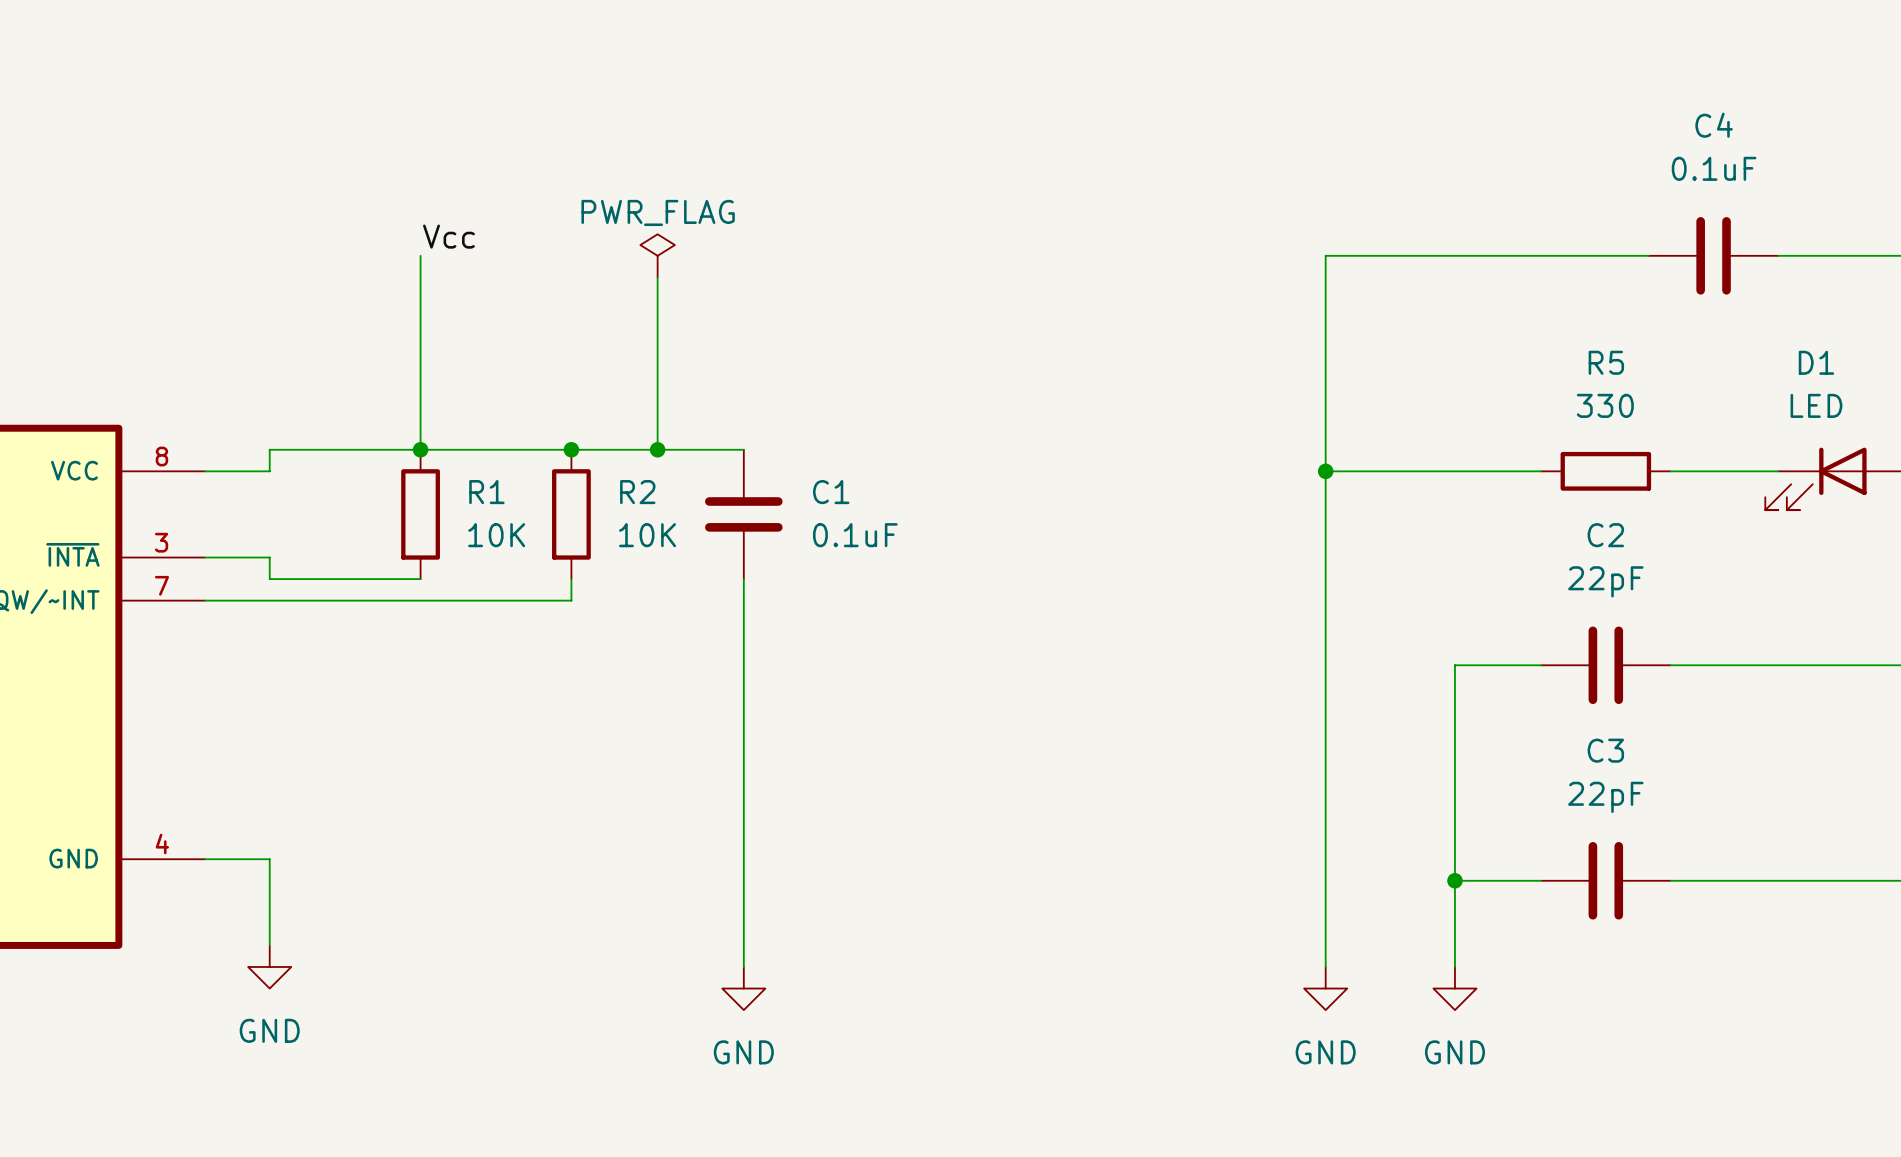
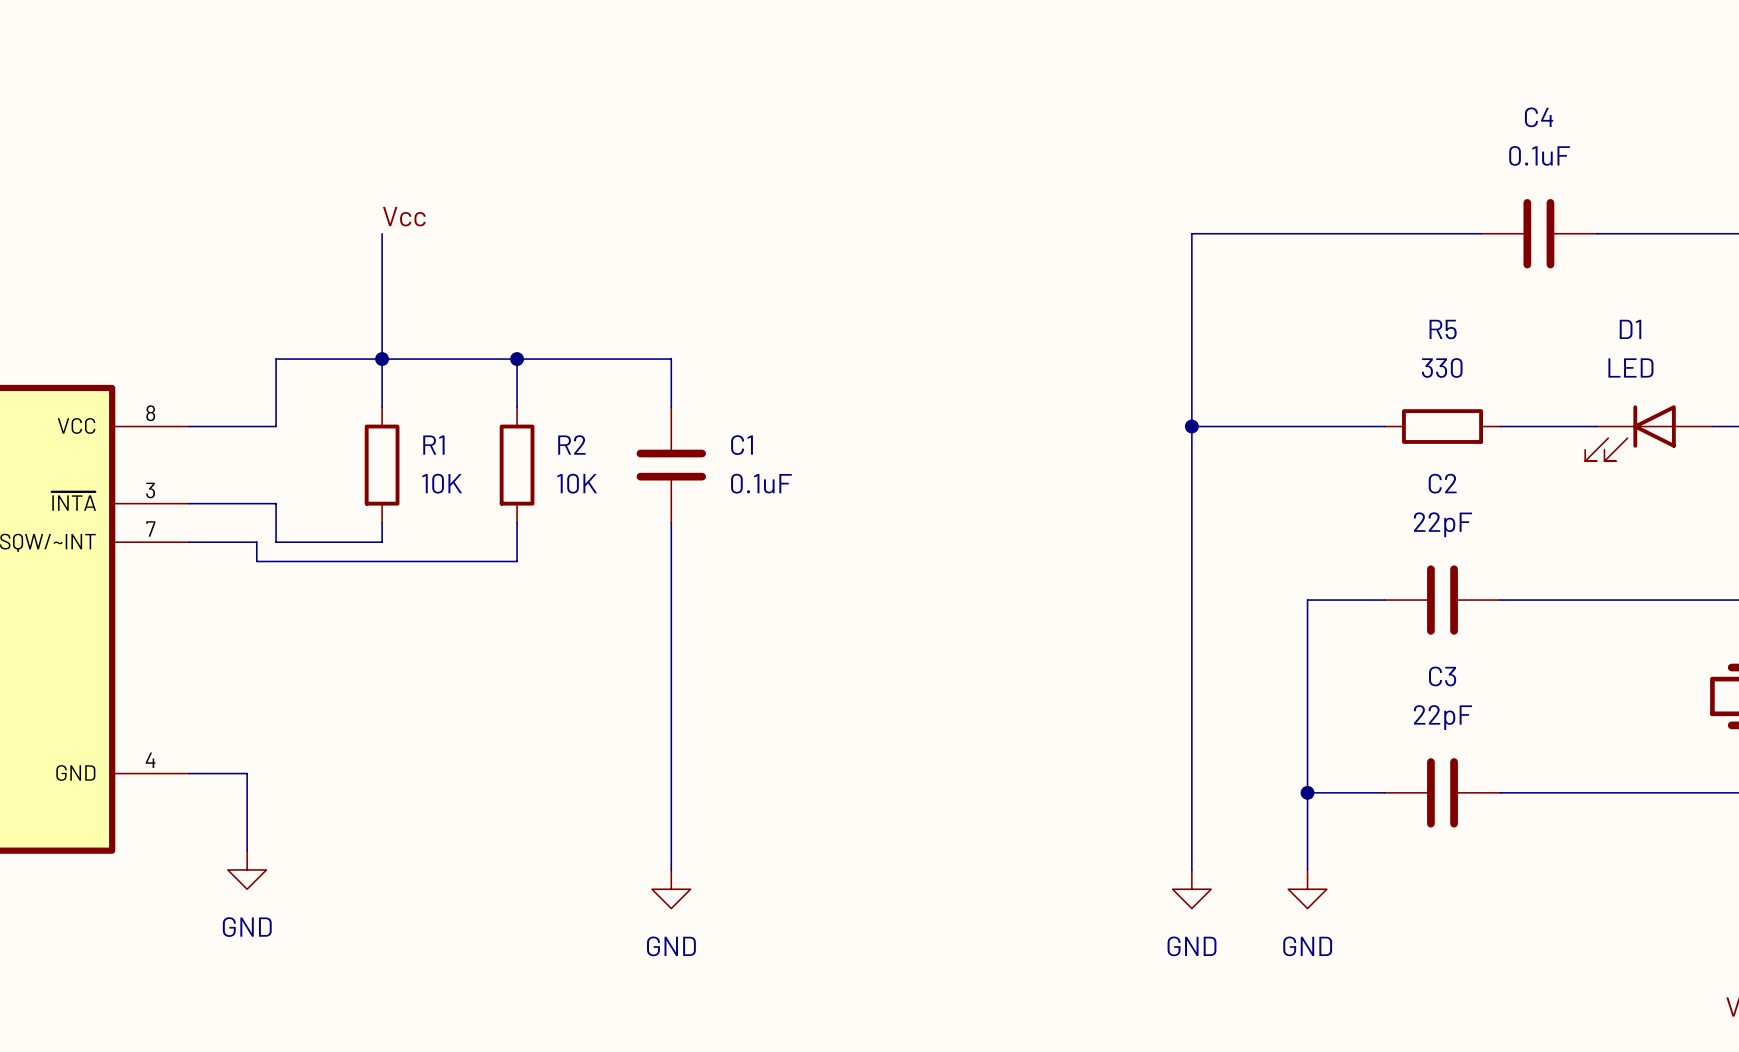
power symbol: PWR_FLAG (657, 255) -> none
wire: (657, 277) (657, 449) -> none
wire: none -> (517, 359) (517, 407)
junction: none -> (517, 359)
junction position: (420, 449) -> (382, 359)
junction: (571, 449) -> none
junction: (657, 449) -> none
wire: (743, 449) (269, 449) (269, 471) -> (671, 407) (671, 359) (276, 359) (276, 426) (247, 426)
wire: (269, 557) (269, 579) (420, 579) -> (382, 542) (382, 522)
wire: (280, 600) (302, 600) -> (247, 503) (276, 503) (276, 542)
wire: (420, 600) (571, 600) -> (256, 542) (256, 561) (517, 561) (517, 542)

